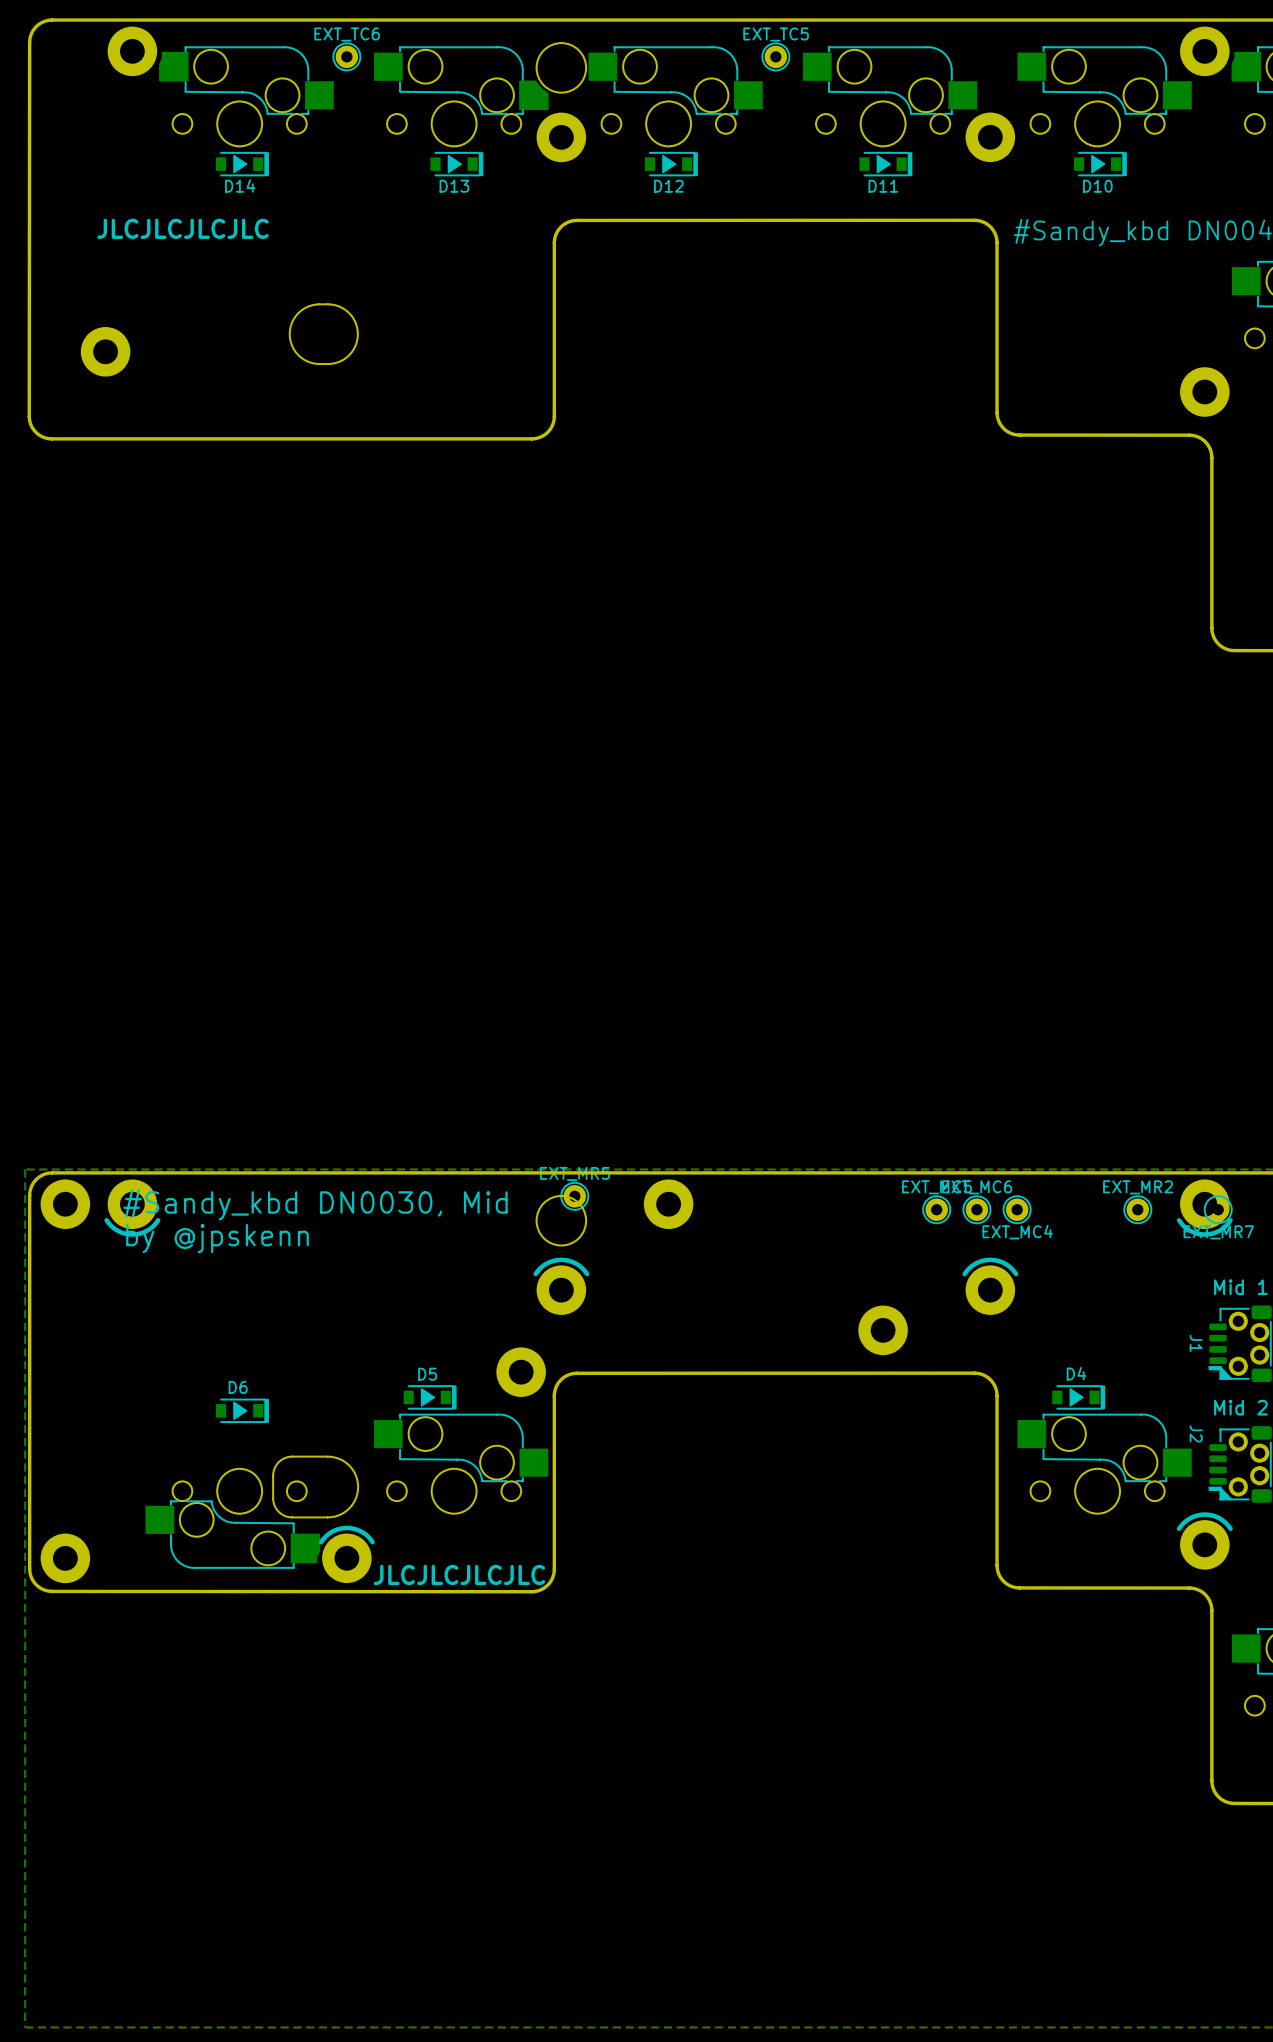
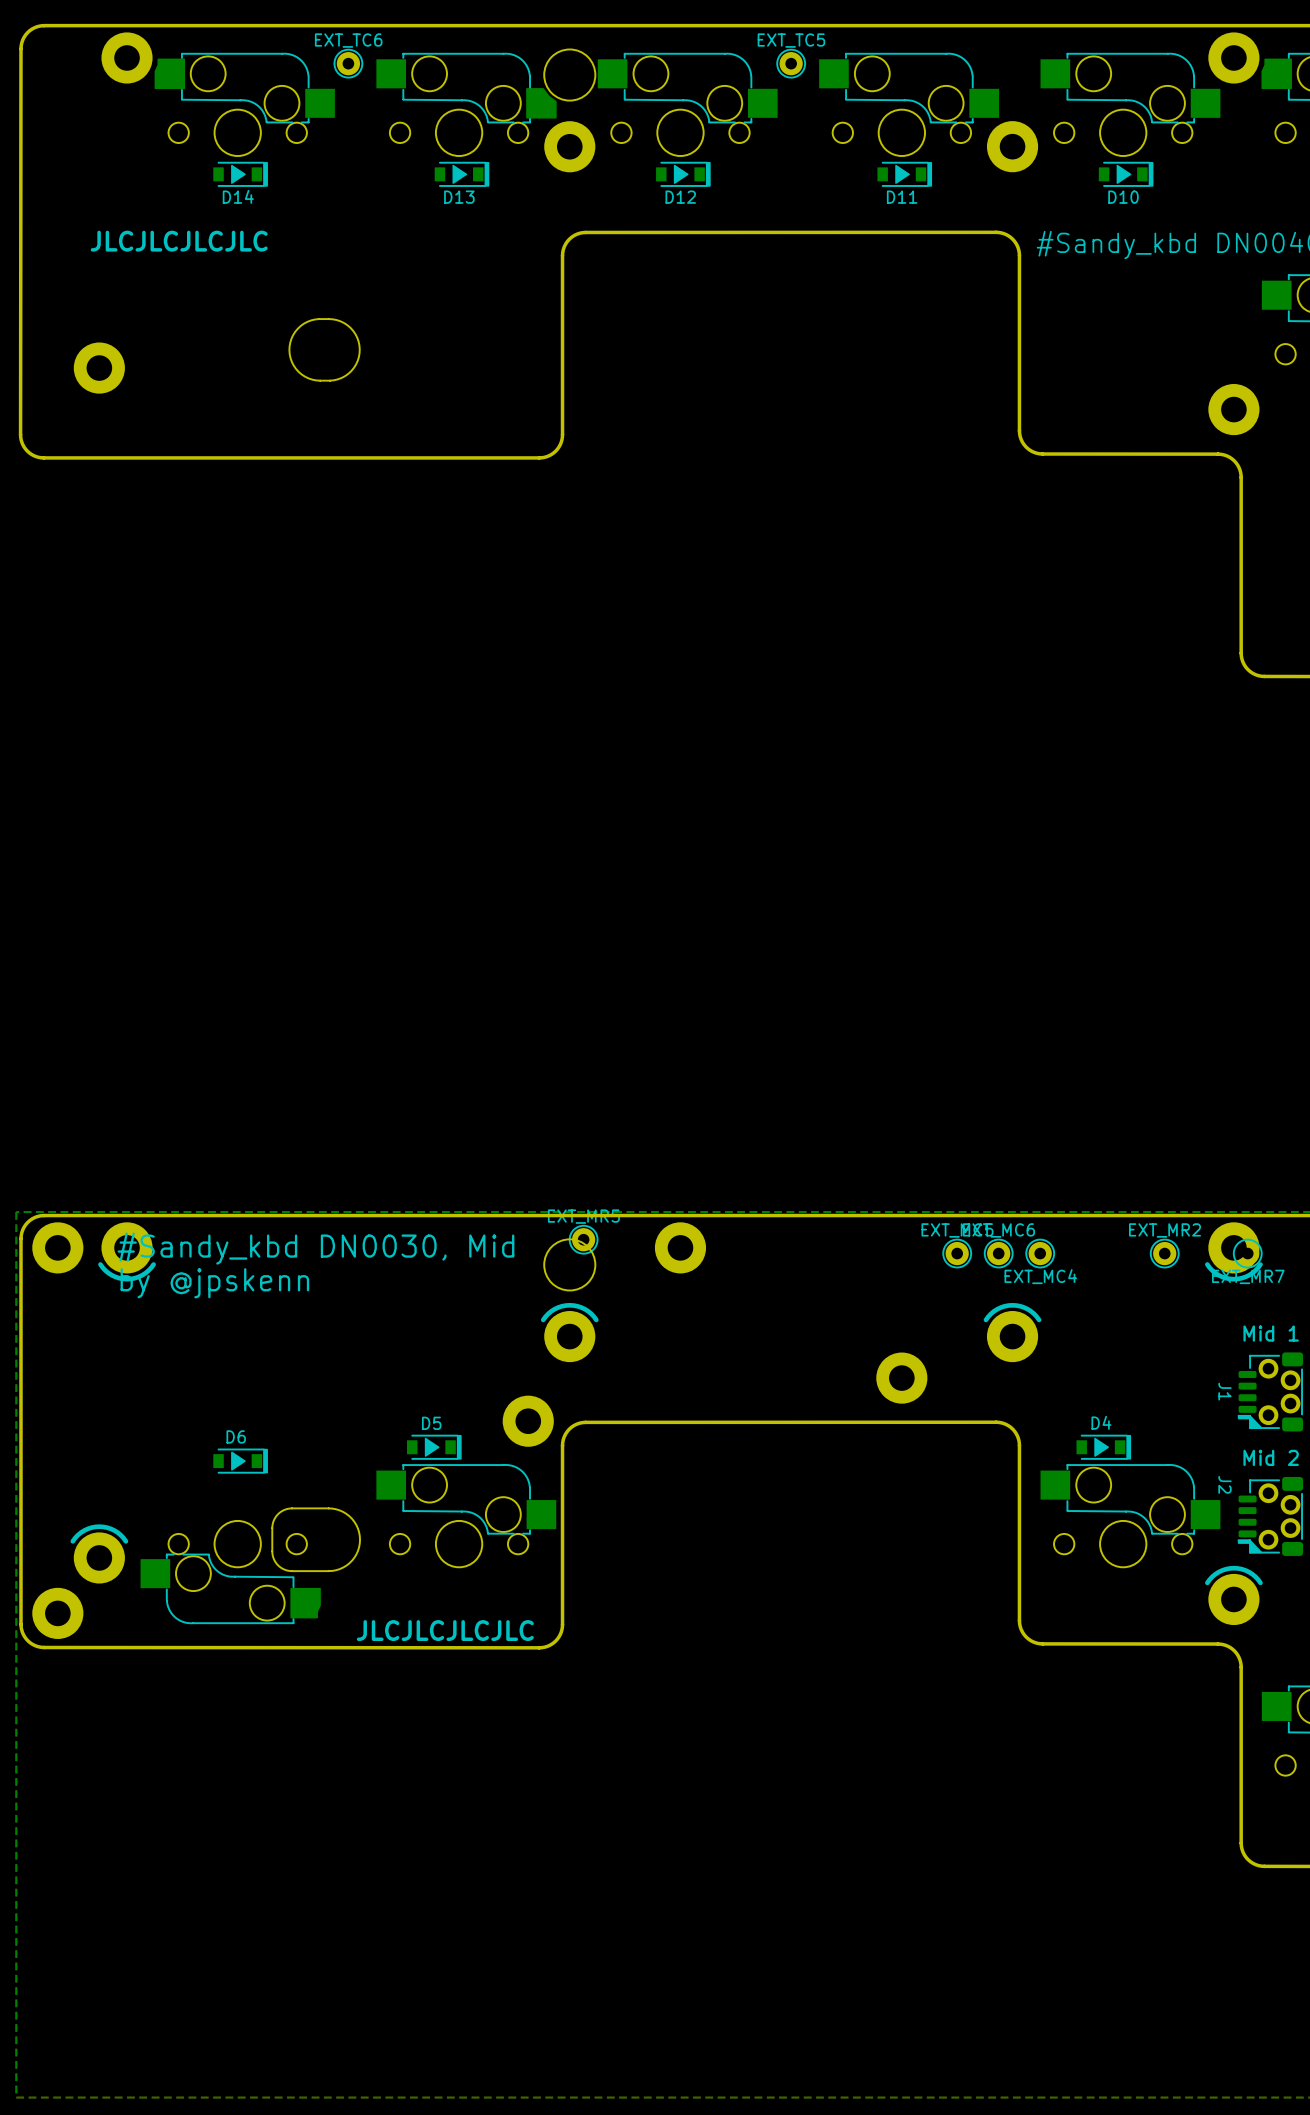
part position: (346, 1554) -> (99, 1553)
text position: JLCJLCJLCJLC (459, 1574) -> JLCJLCJLCJLC (445, 1630)

